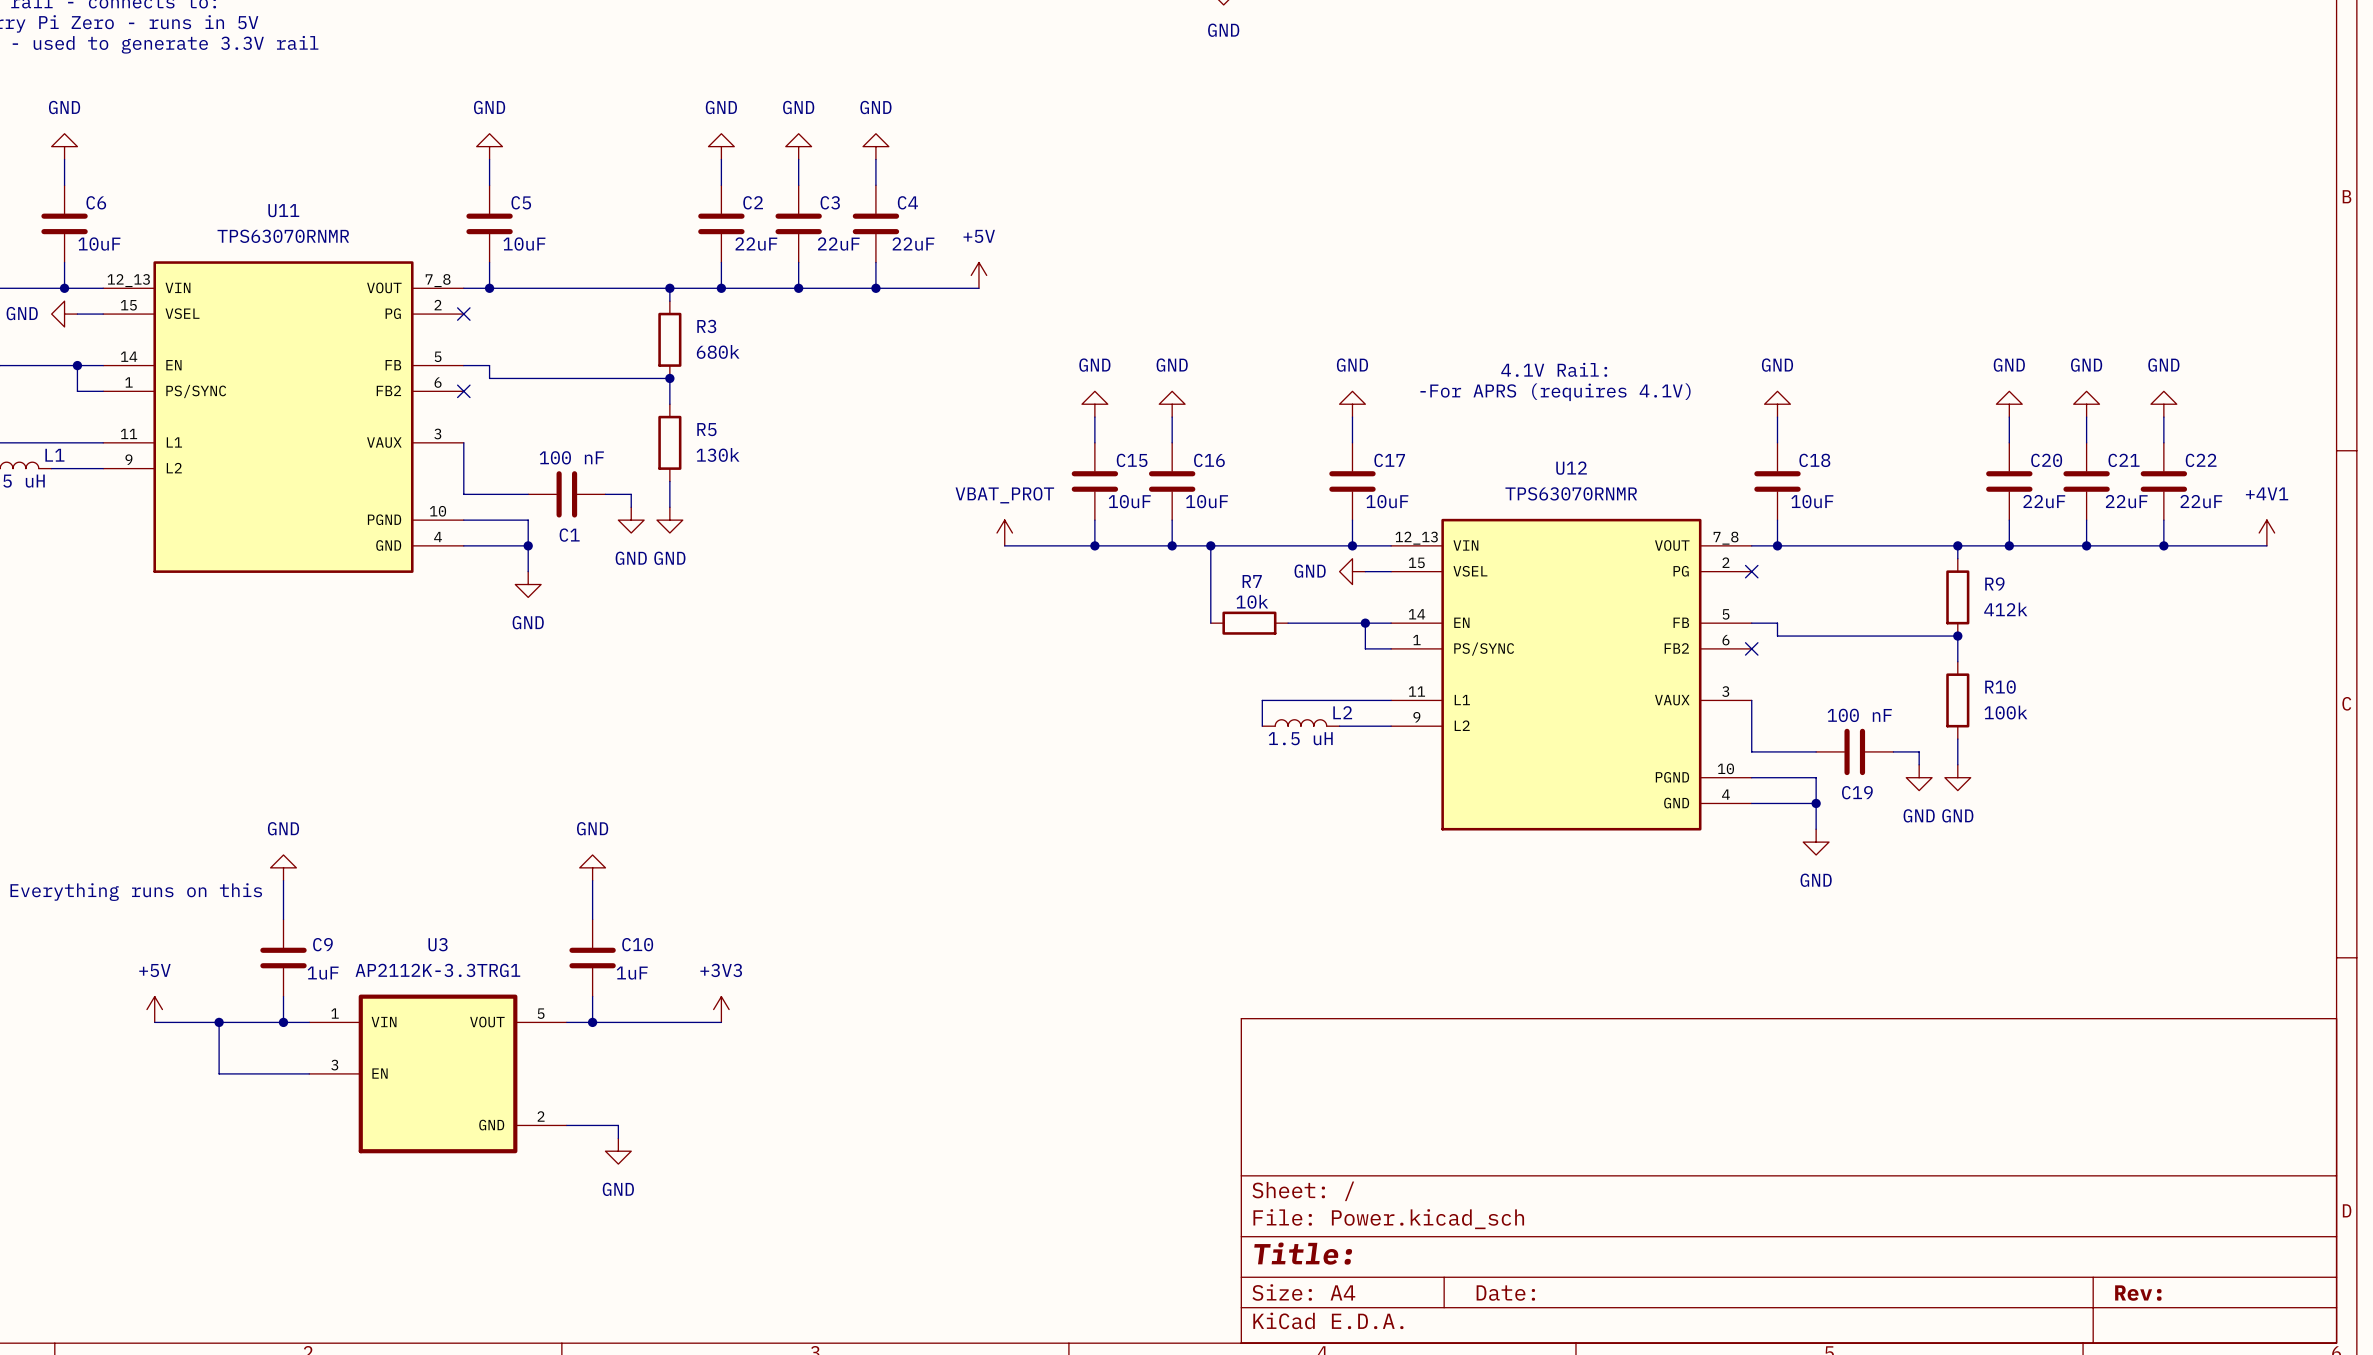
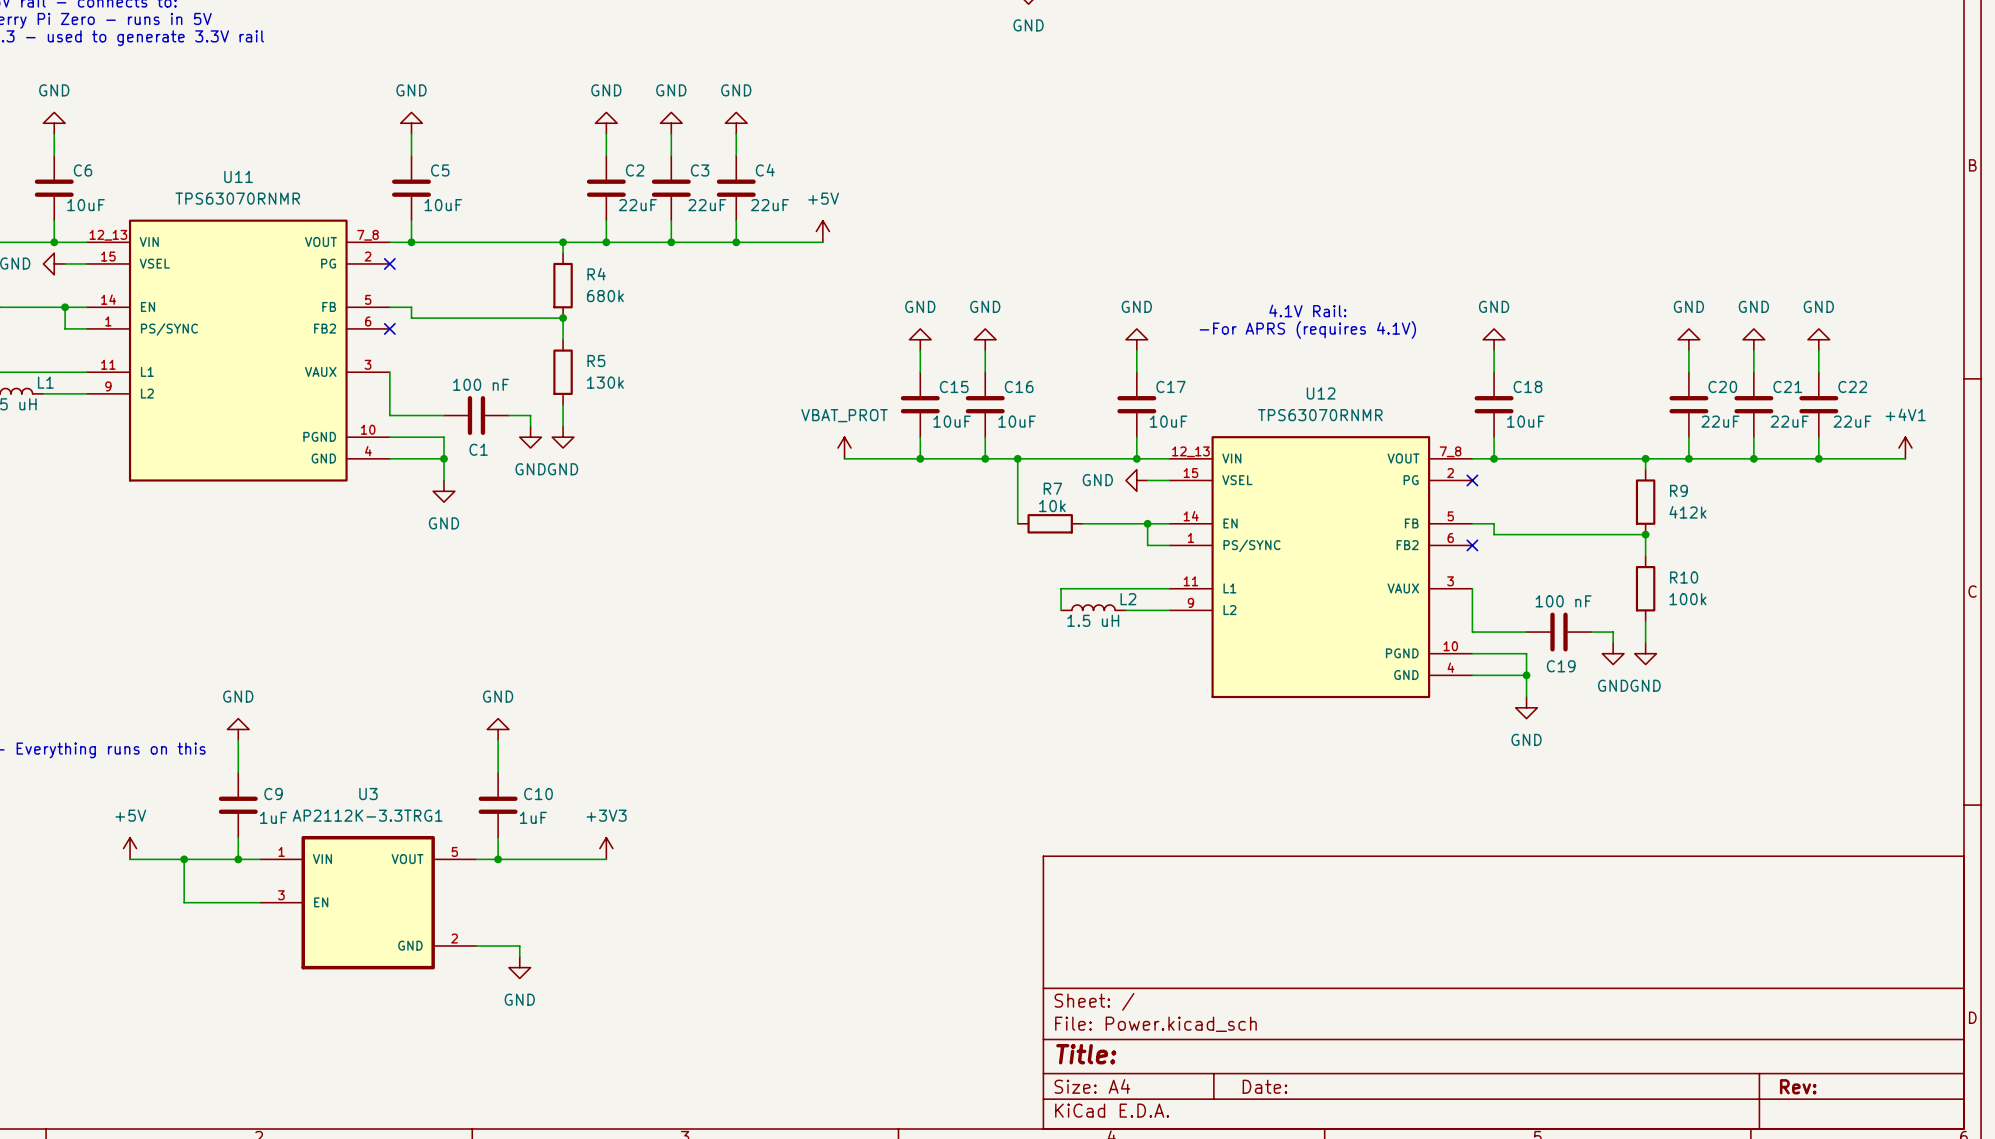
R3 name: R3 (706, 326) -> R4 (596, 274)

